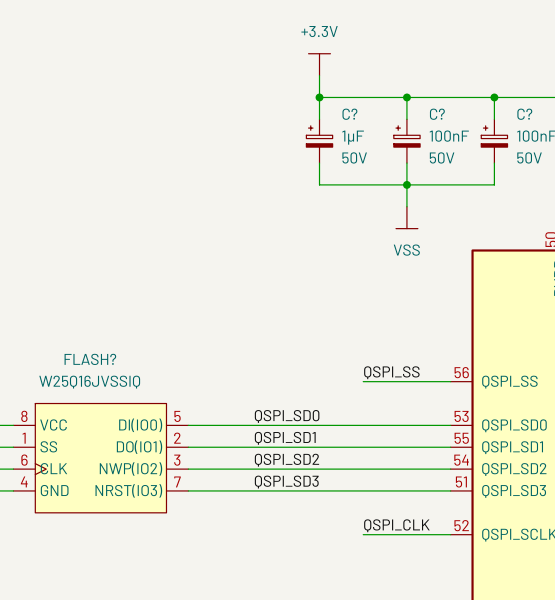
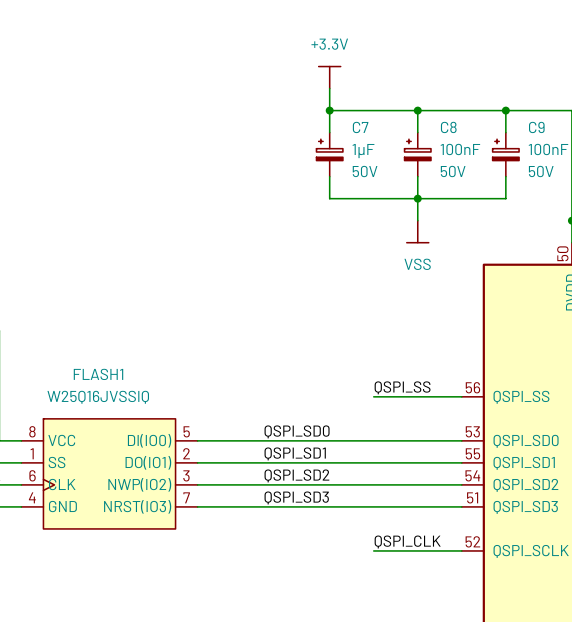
C? name: C? (349, 114) -> C7 (360, 127)
C? name: C? (437, 114) -> C8 (448, 127)
C? name: C? (524, 114) -> C9 (536, 127)
FLASH? name: FLASH? (90, 359) -> FLASH1 (98, 374)

